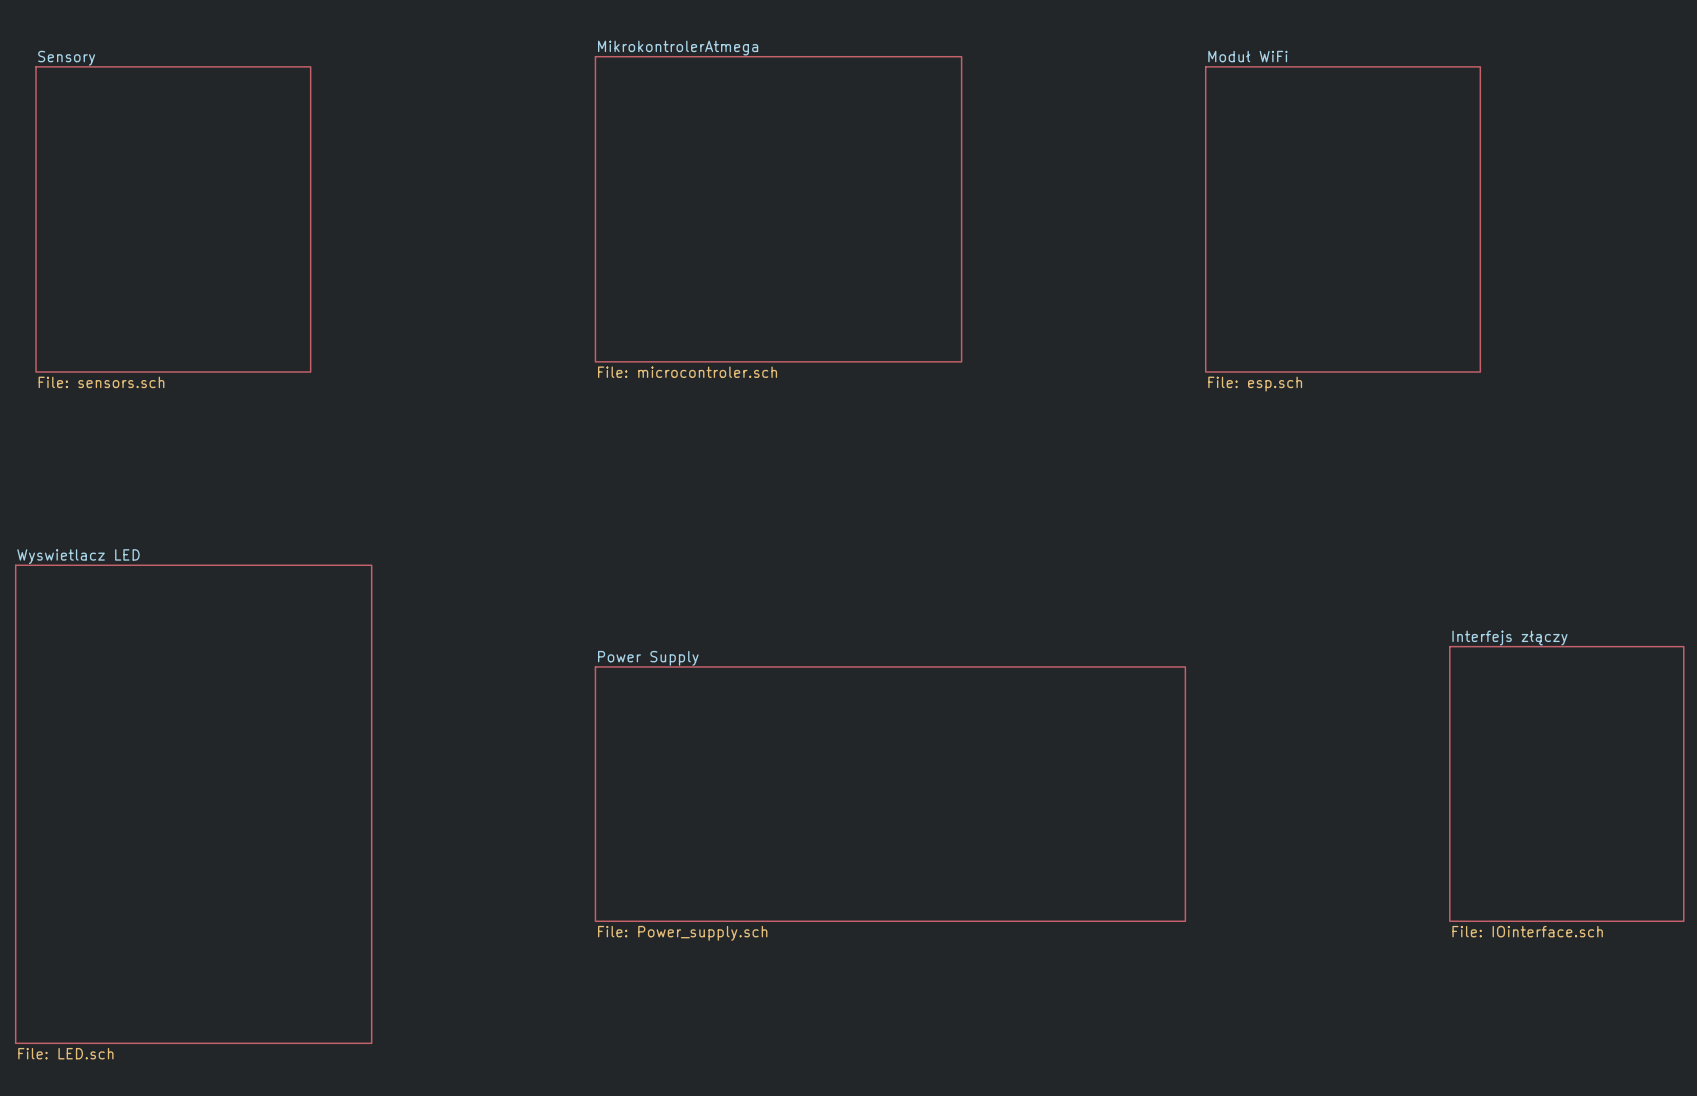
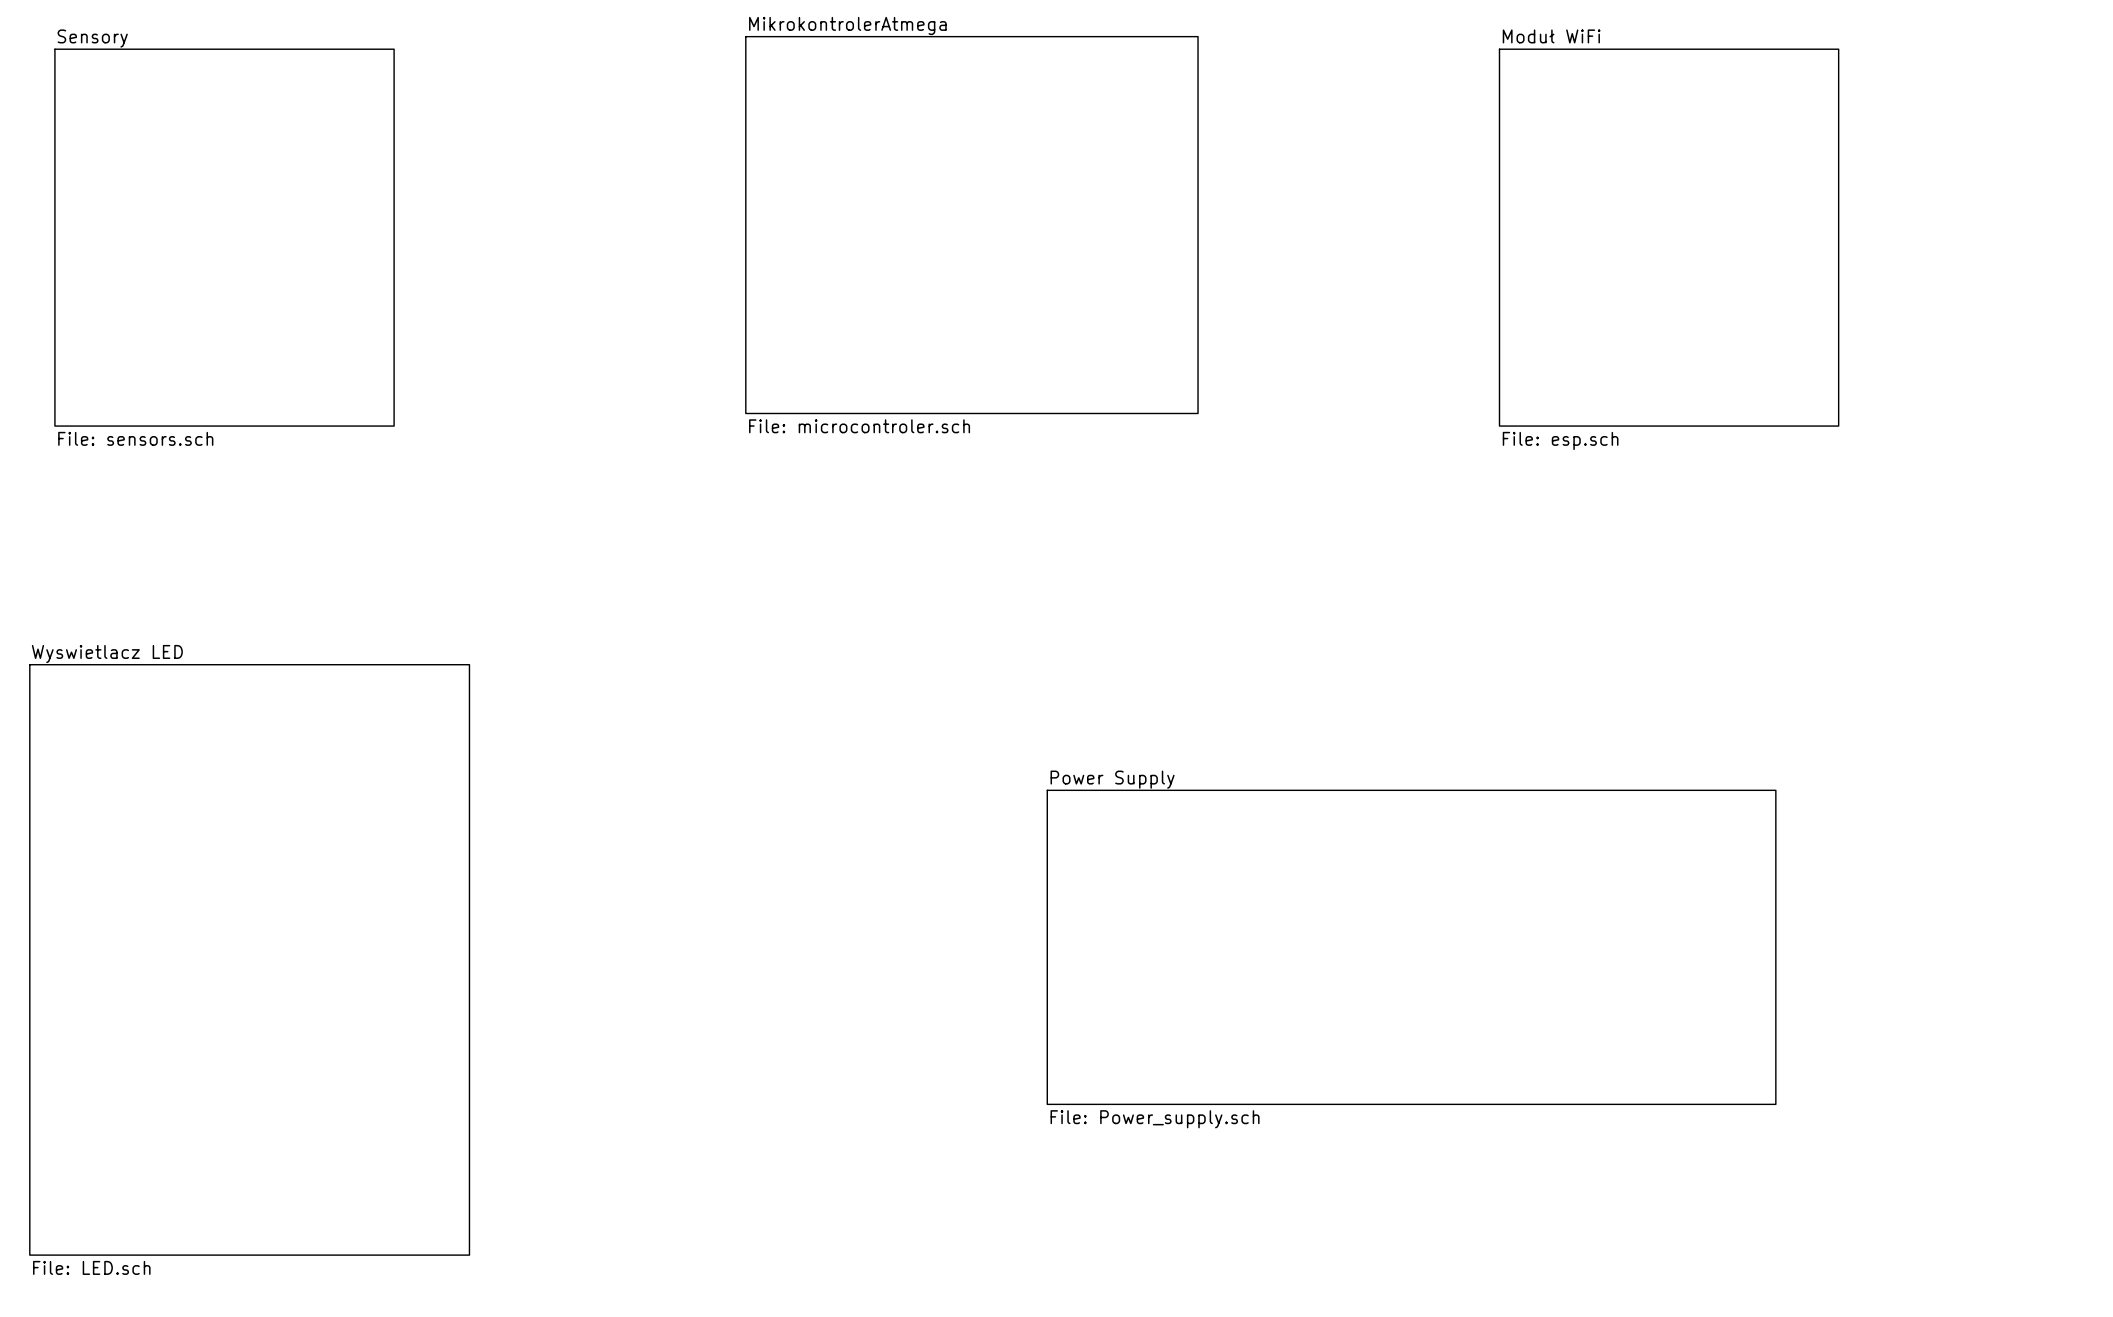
sheet Interfejs złączy: File: IOinterface.sch (1566, 783) -> none
sheet Power Supply: File: Power_supply.sch (890, 794) -> none
sheet Power Supply: none -> File: Power_supply.sch (1411, 947)

